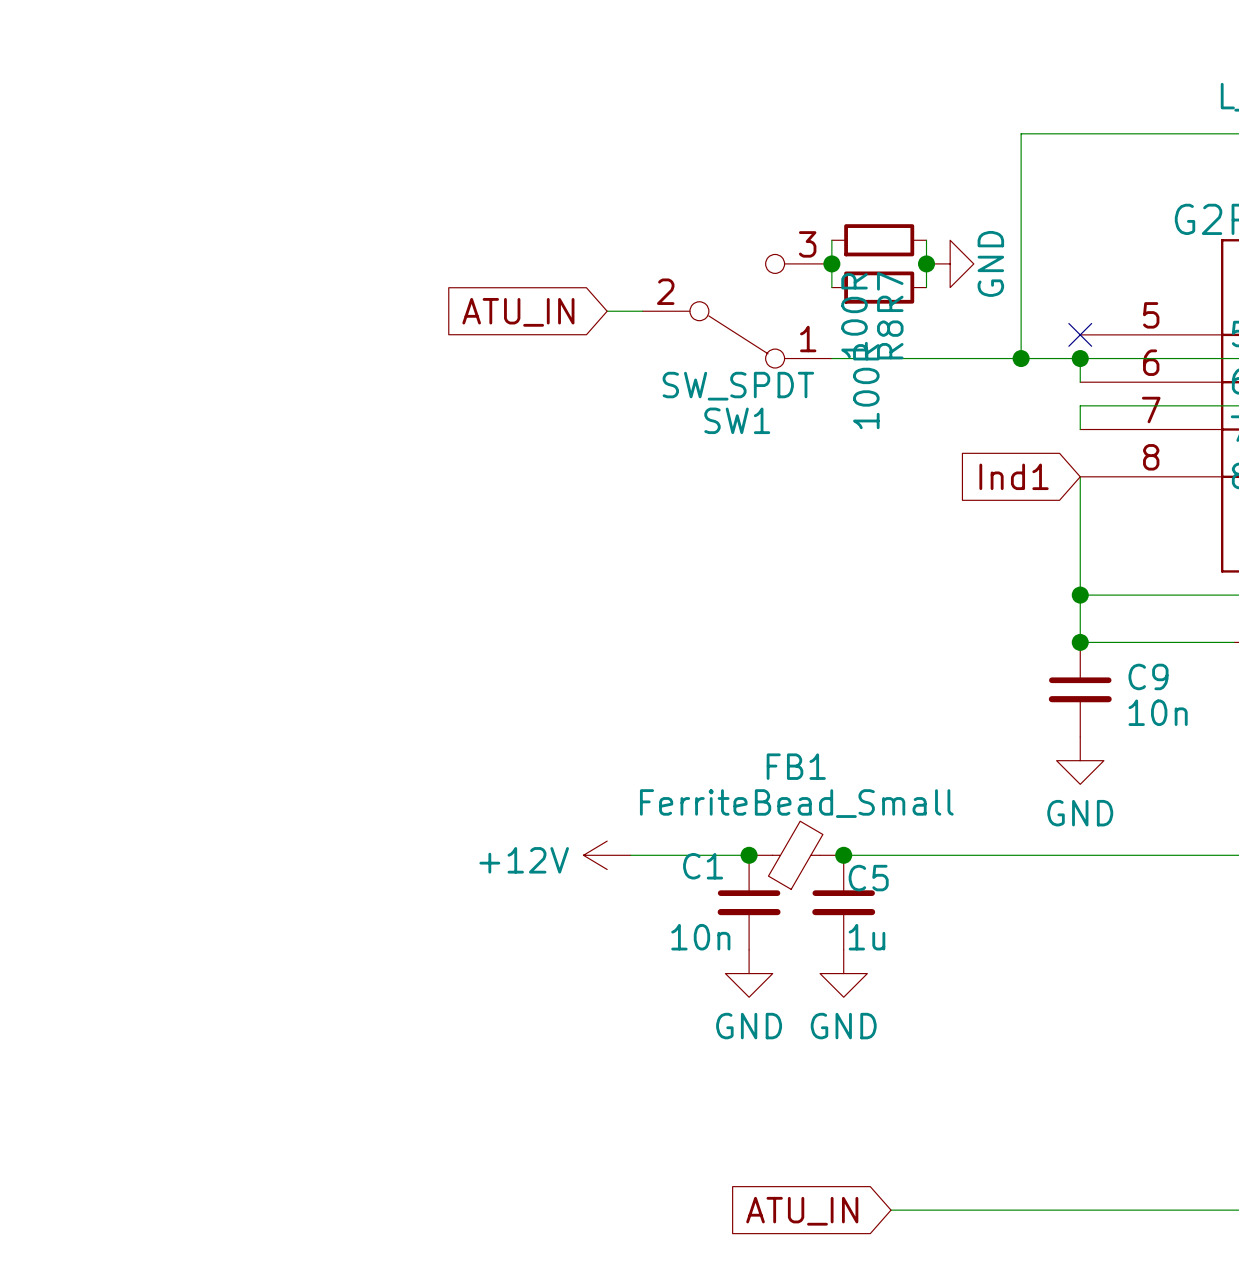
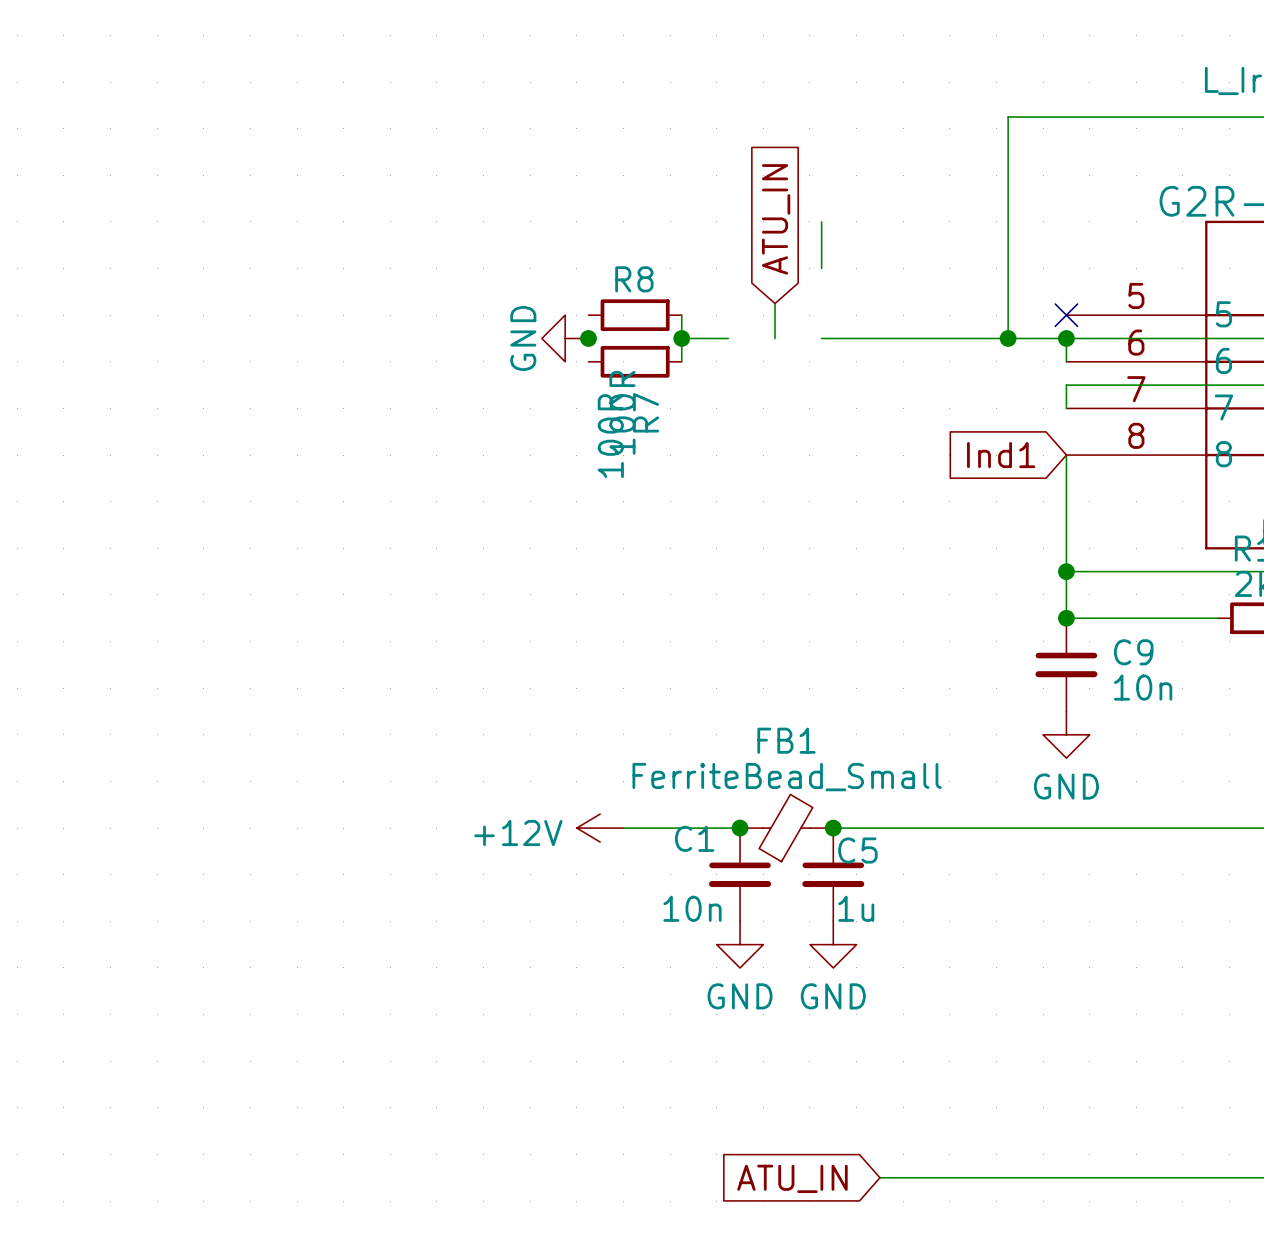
R7 position: (879, 240) -> (635, 361)
wire: (926, 240) (926, 287) -> (681, 315) (681, 361)
junction: (831, 263) -> none
junction: (926, 263) -> none
power symbol rotation: 0° (950, 263) -> 180° (565, 338)
power symbol position: GND (950, 263) -> GND (565, 338)
R8 position: (879, 287) -> (635, 315)
wire: (607, 311) (642, 311) -> none
SW1: SW_SPDT (737, 311) -> none
global label rotation: 0° (518, 312) -> 90° clockwise (776, 219)
global label position: ATU_IN (518, 312) -> ATU_IN (776, 219)
wire: none -> (775, 303) (775, 338)
R8 name rotation: 0° (890, 339) -> 90° clockwise (634, 279)
R8 name position: R8 (890, 339) -> R8 (634, 279)
junction: none -> (588, 338)
wire: none -> (681, 338) (728, 338)
junction: none -> (681, 338)

